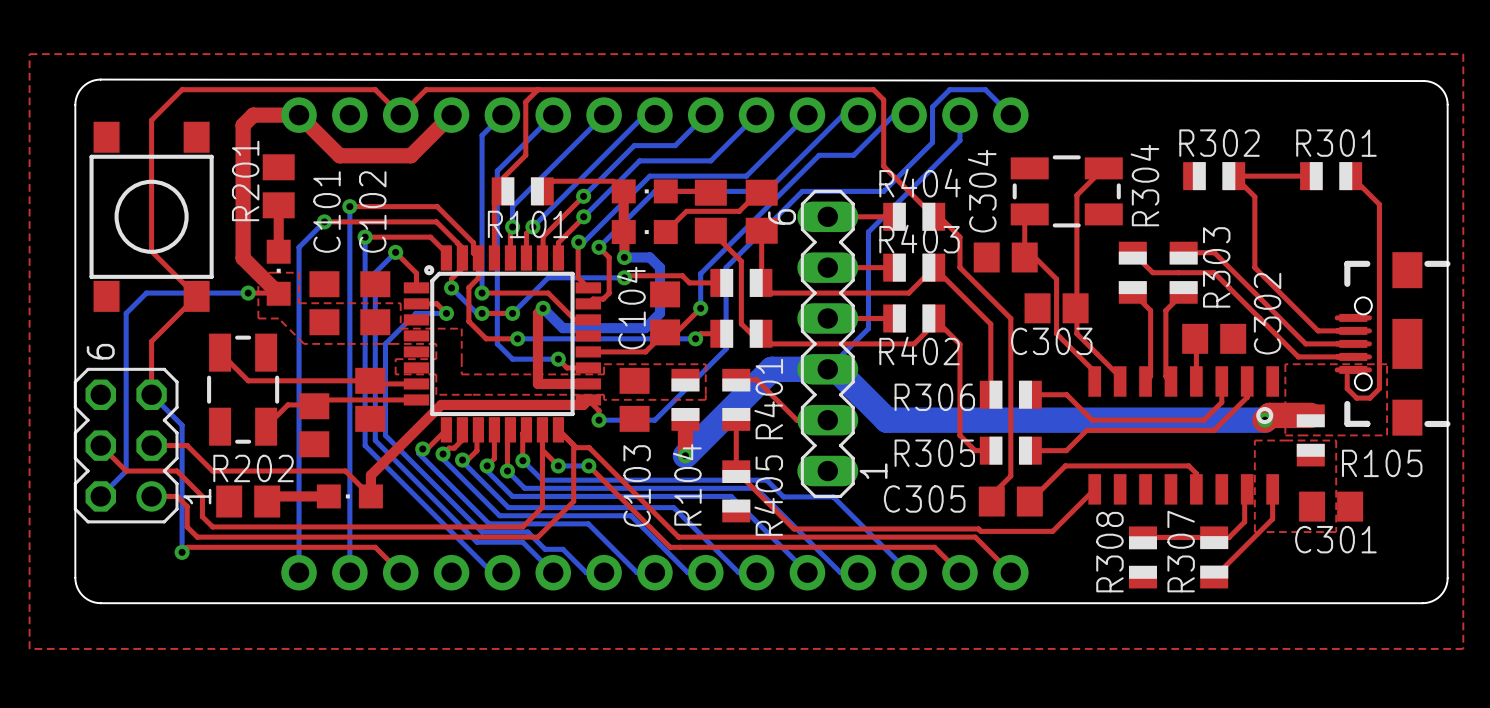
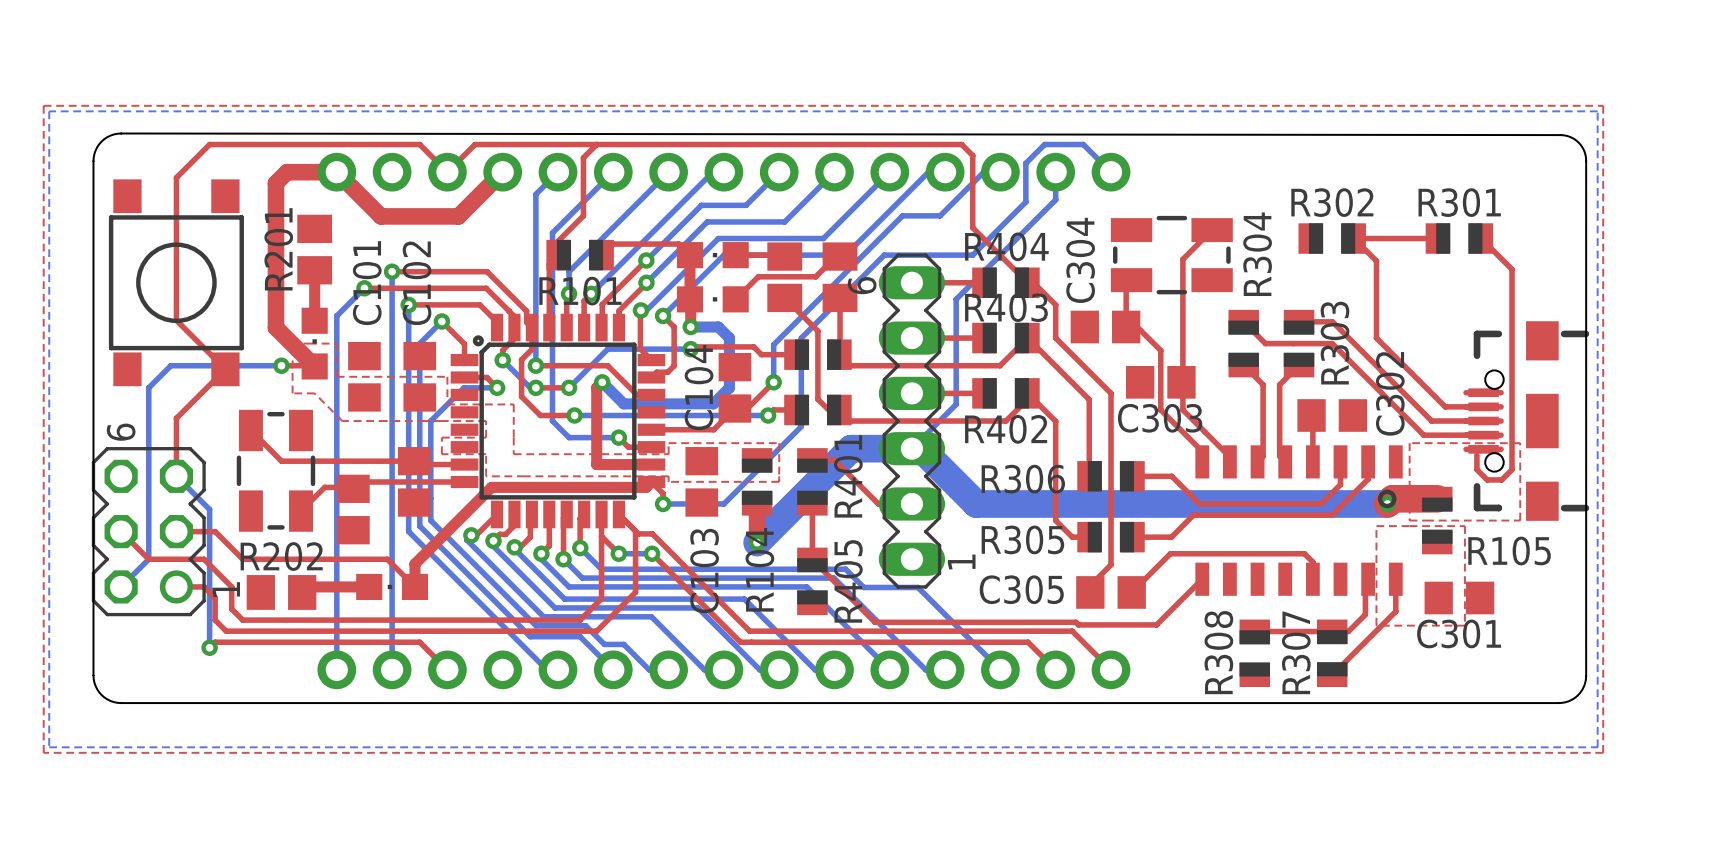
bottom zone outline: none -> (49, 111) (49, 747) (1597, 747) (1597, 111) (49, 111)

